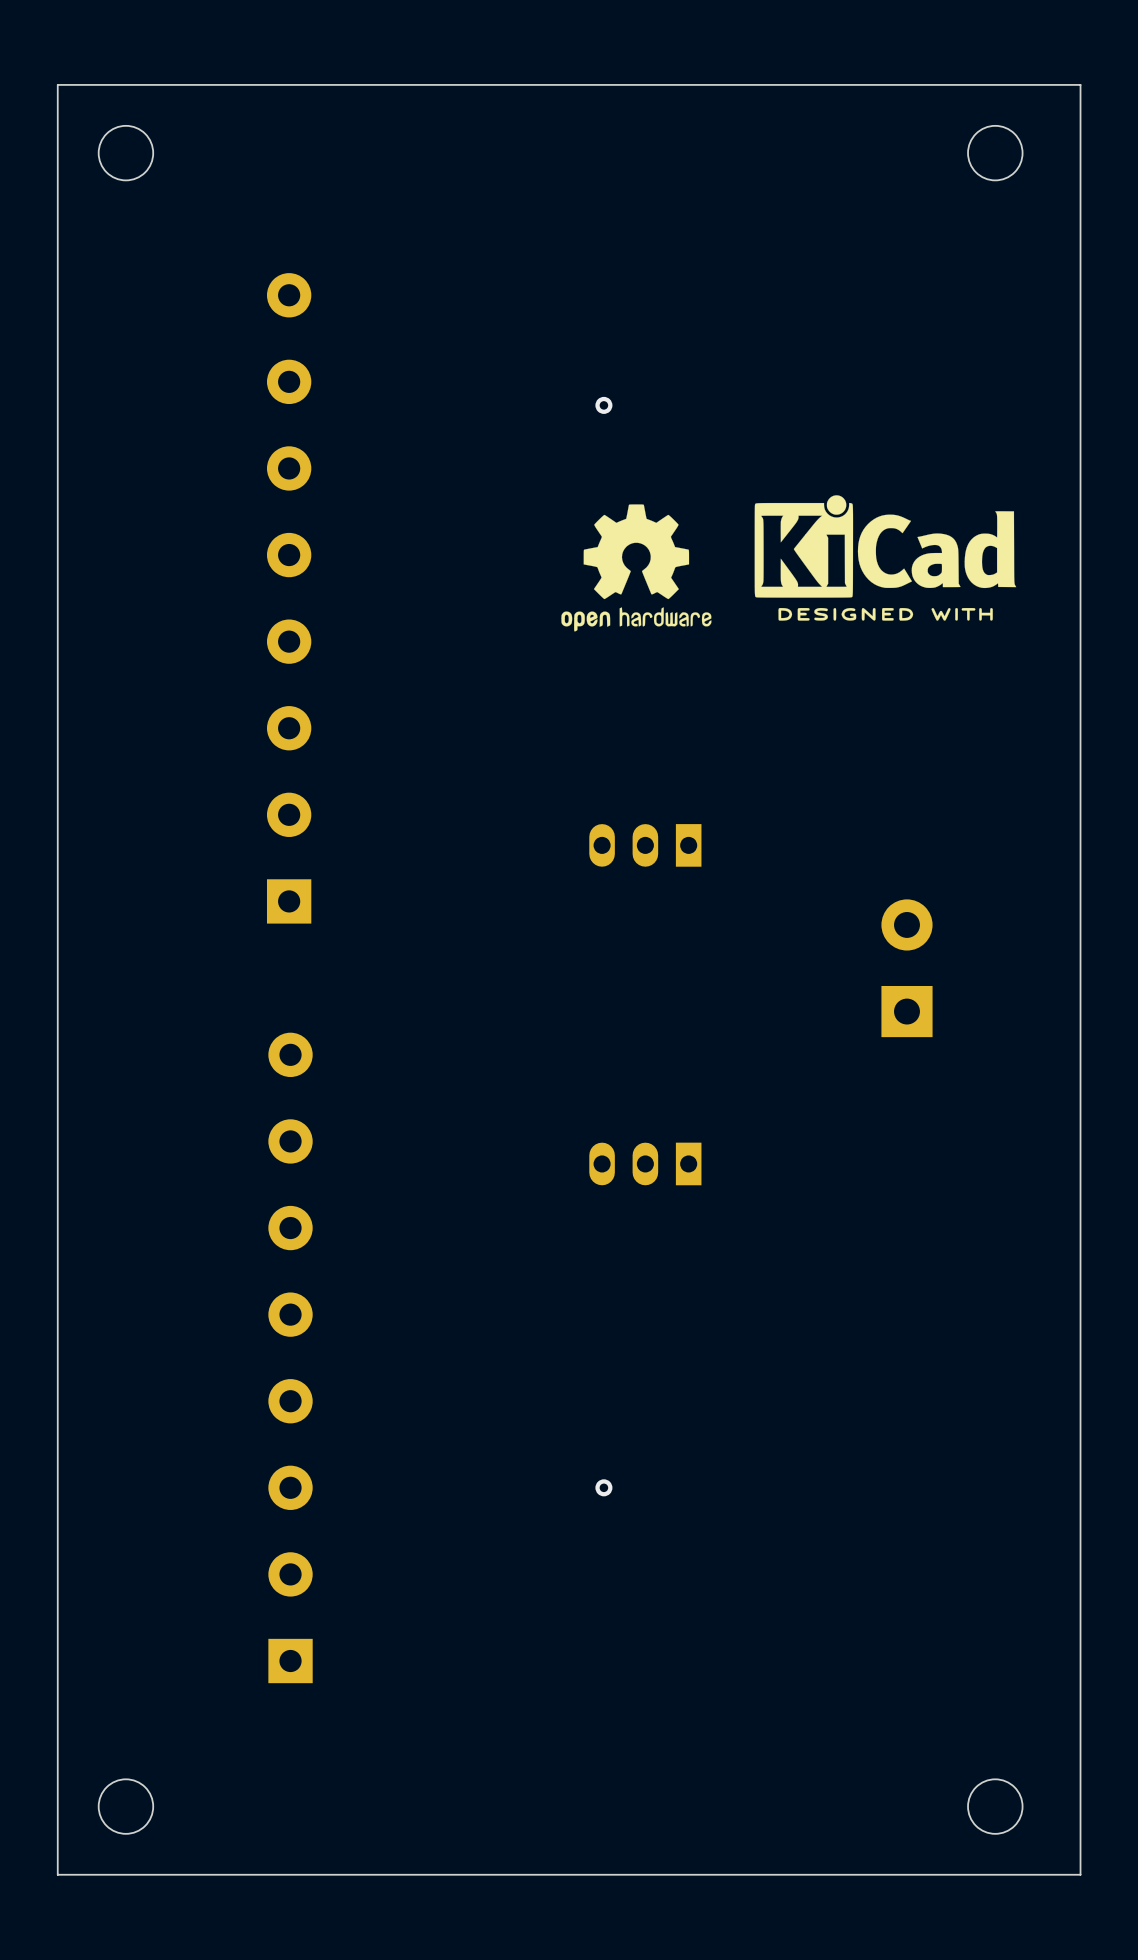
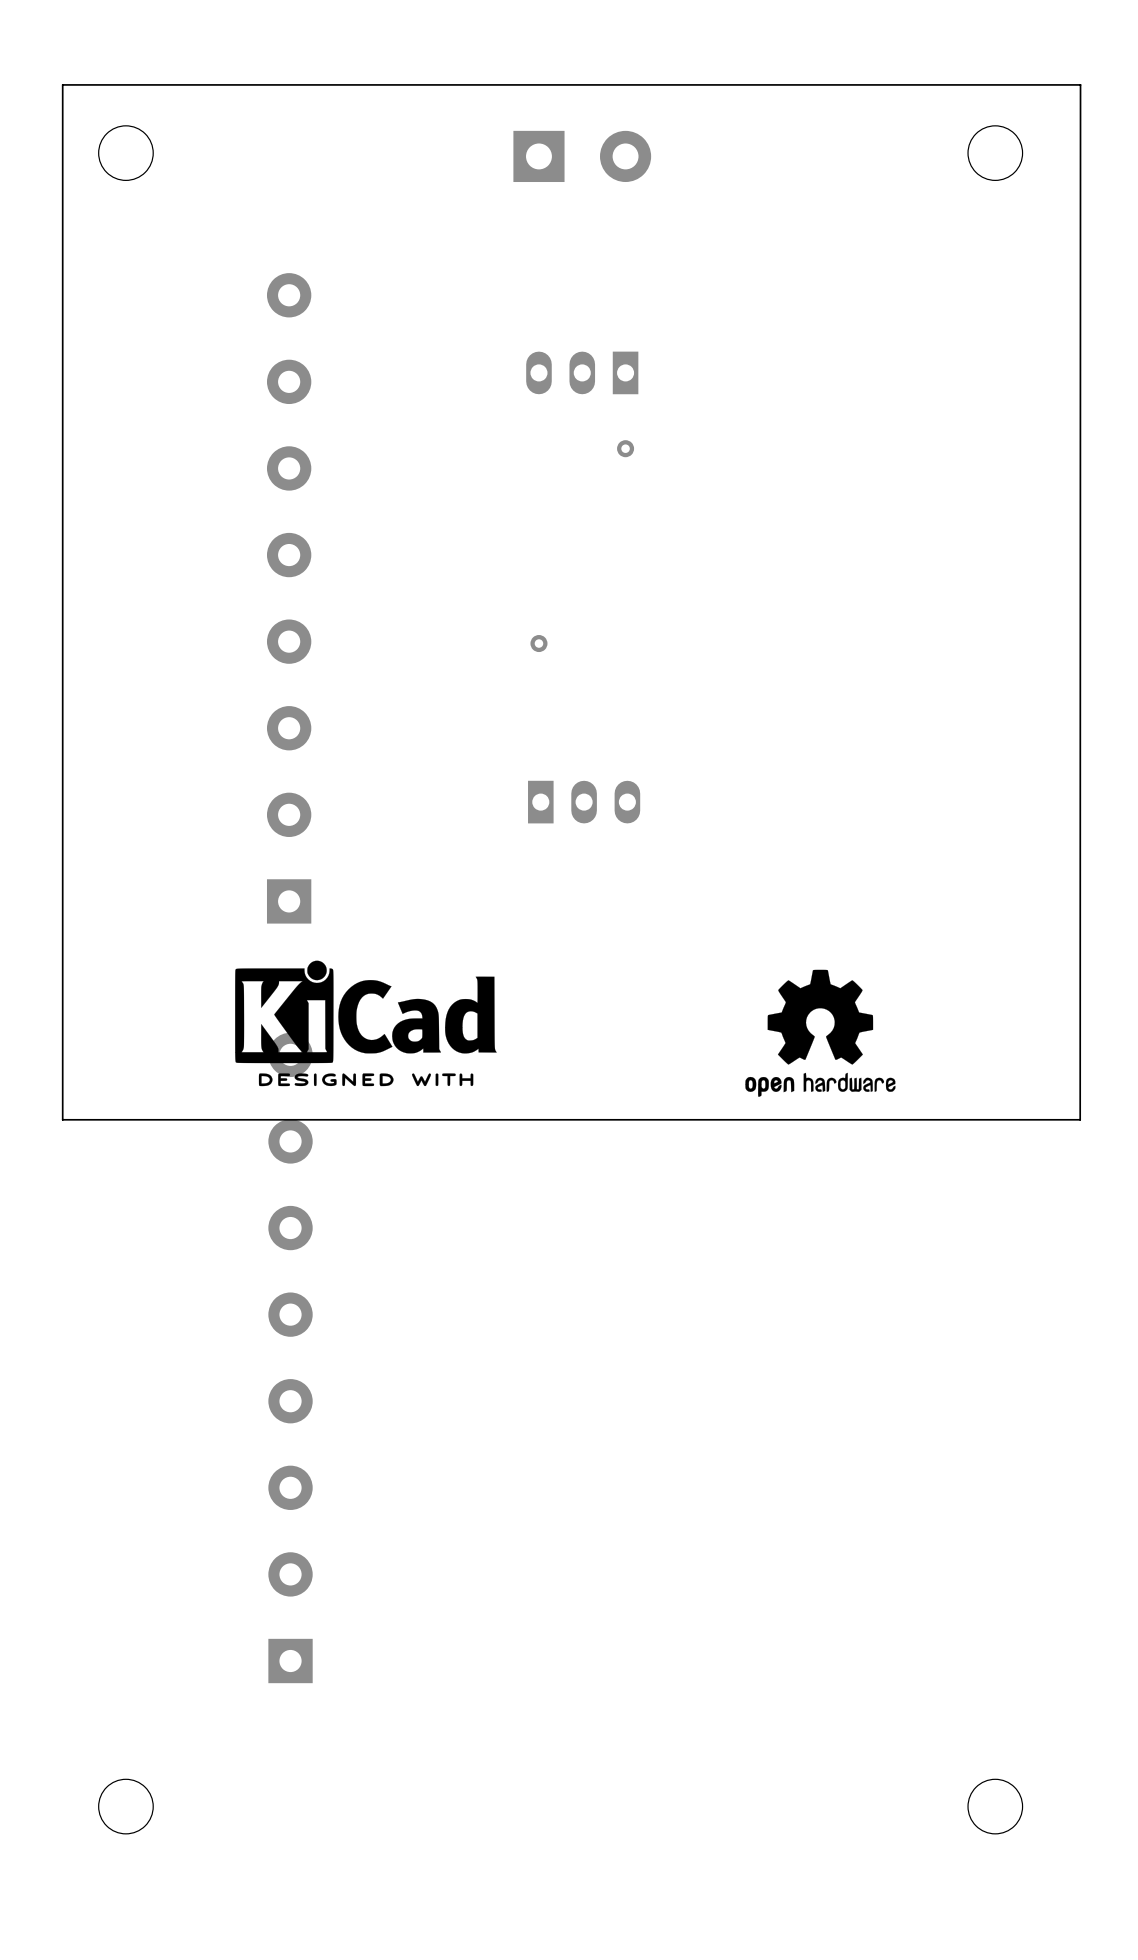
board edge: (1080, 84) (1080, 1874) (57, 1874) (57, 84) (62, 84) -> (1080, 84) (1080, 1119) (62, 1119) (62, 84)
part: none -> (582, 156)
part: none -> (582, 372)
via position: (603, 405) -> (625, 448)
drawing: [754, 495, 1017, 621] -> none
drawing: [561, 504, 712, 632] -> none
via: none -> (538, 643)
part rotation: 0° (645, 845) -> 180° (584, 802)
part position: (645, 845) -> (584, 802)
drawing: none -> [235, 960, 497, 1087]
part: (906, 968) -> none
drawing: none -> [745, 969, 896, 1097]
part: (645, 1163) -> none
via: (603, 1487) -> none

